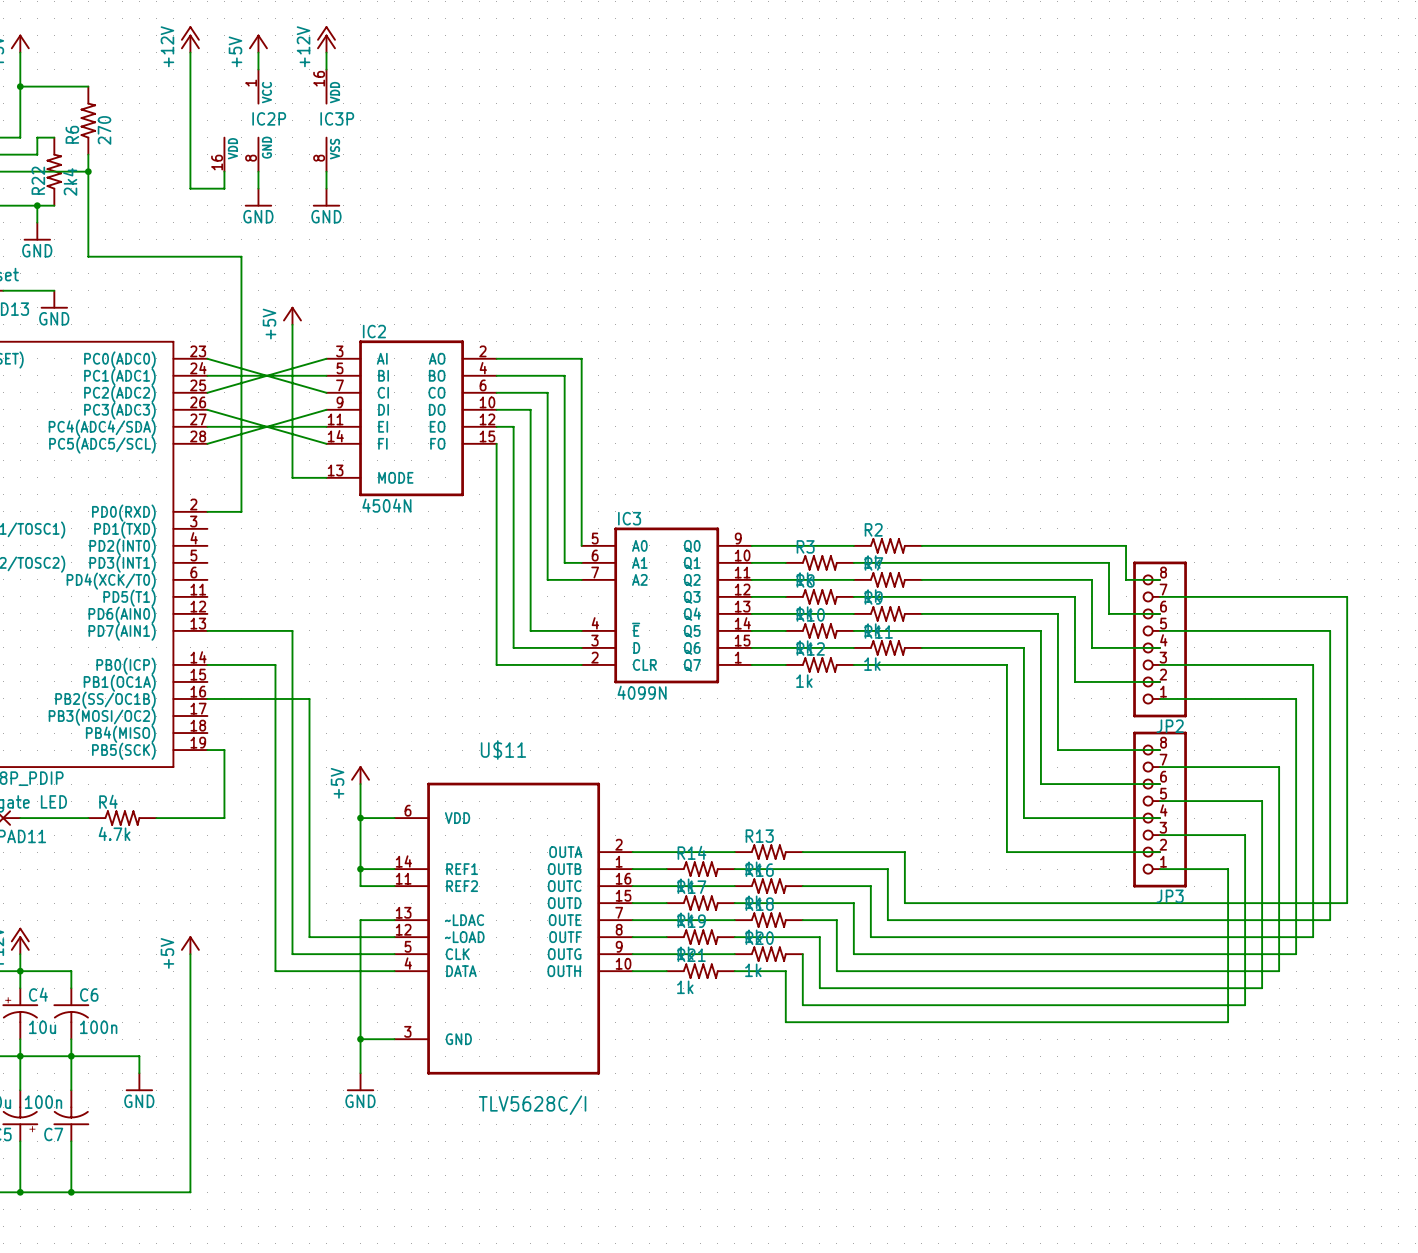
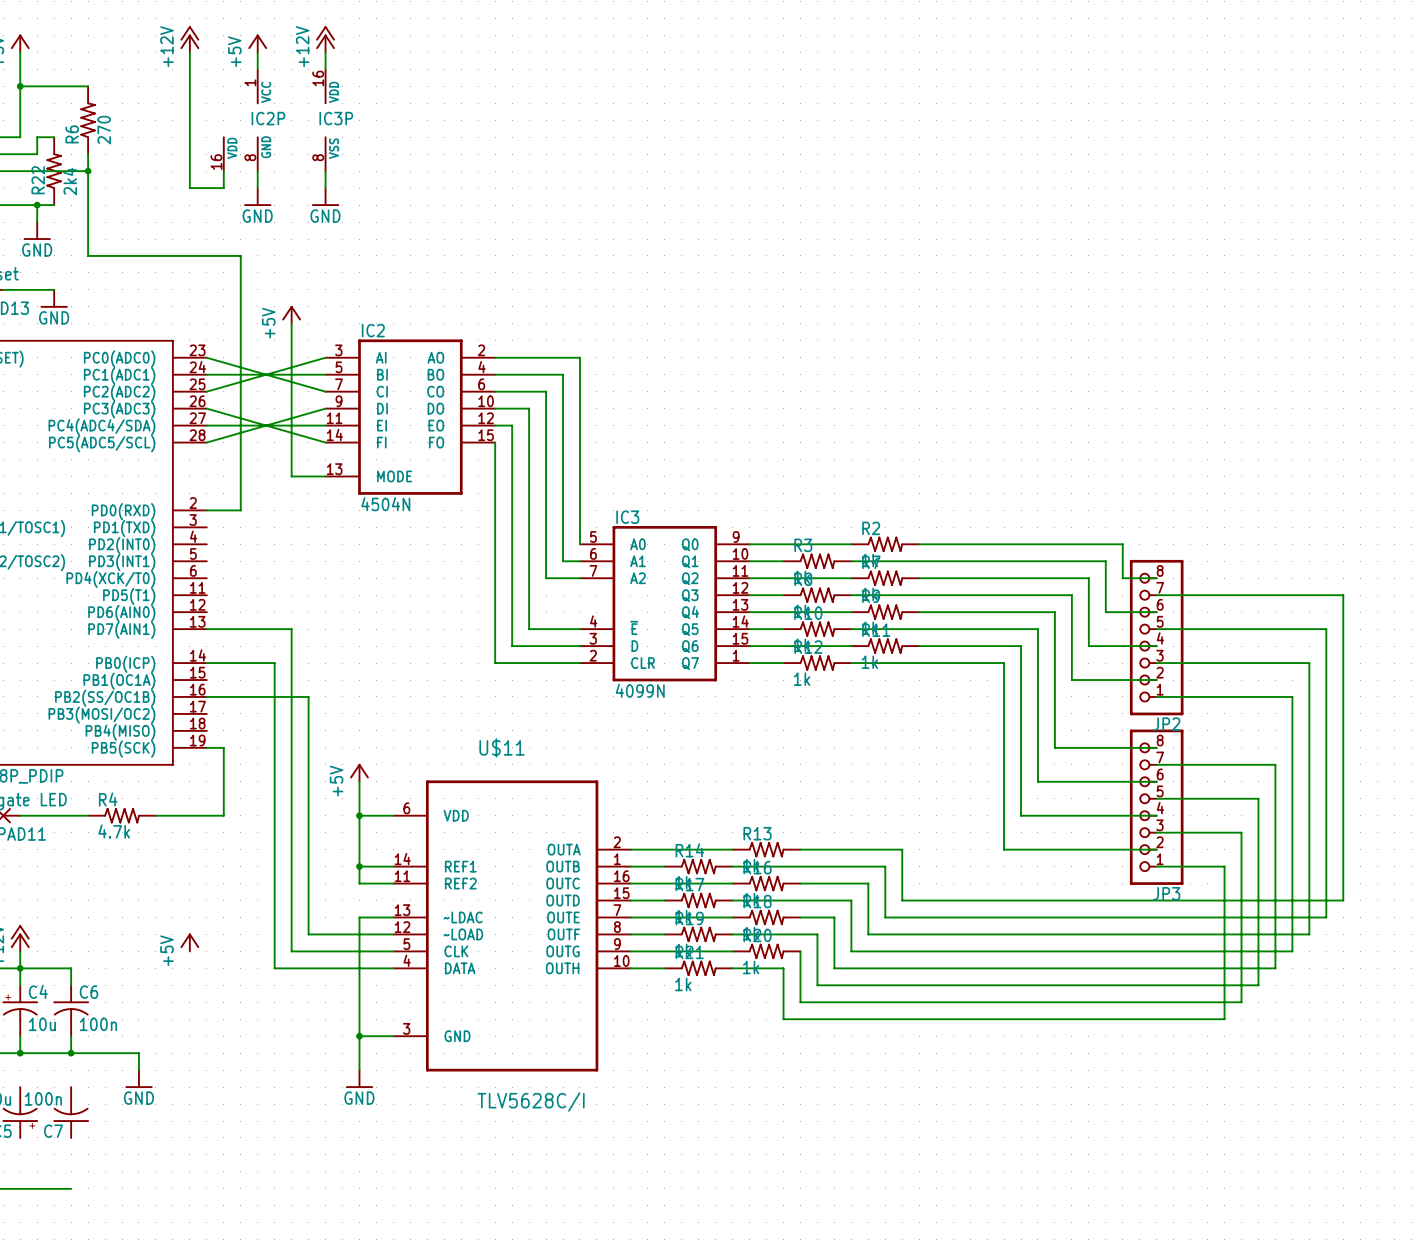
wire: (190, 954) (190, 1192) (71, 1192) (71, 1141) -> none
wire: (20, 1056) (20, 1090) -> none
wire: (71, 1056) (71, 1090) -> none
wire: (20, 1141) (20, 1192) -> none
junction: (20, 1192) -> none
junction: (71, 1192) -> none

